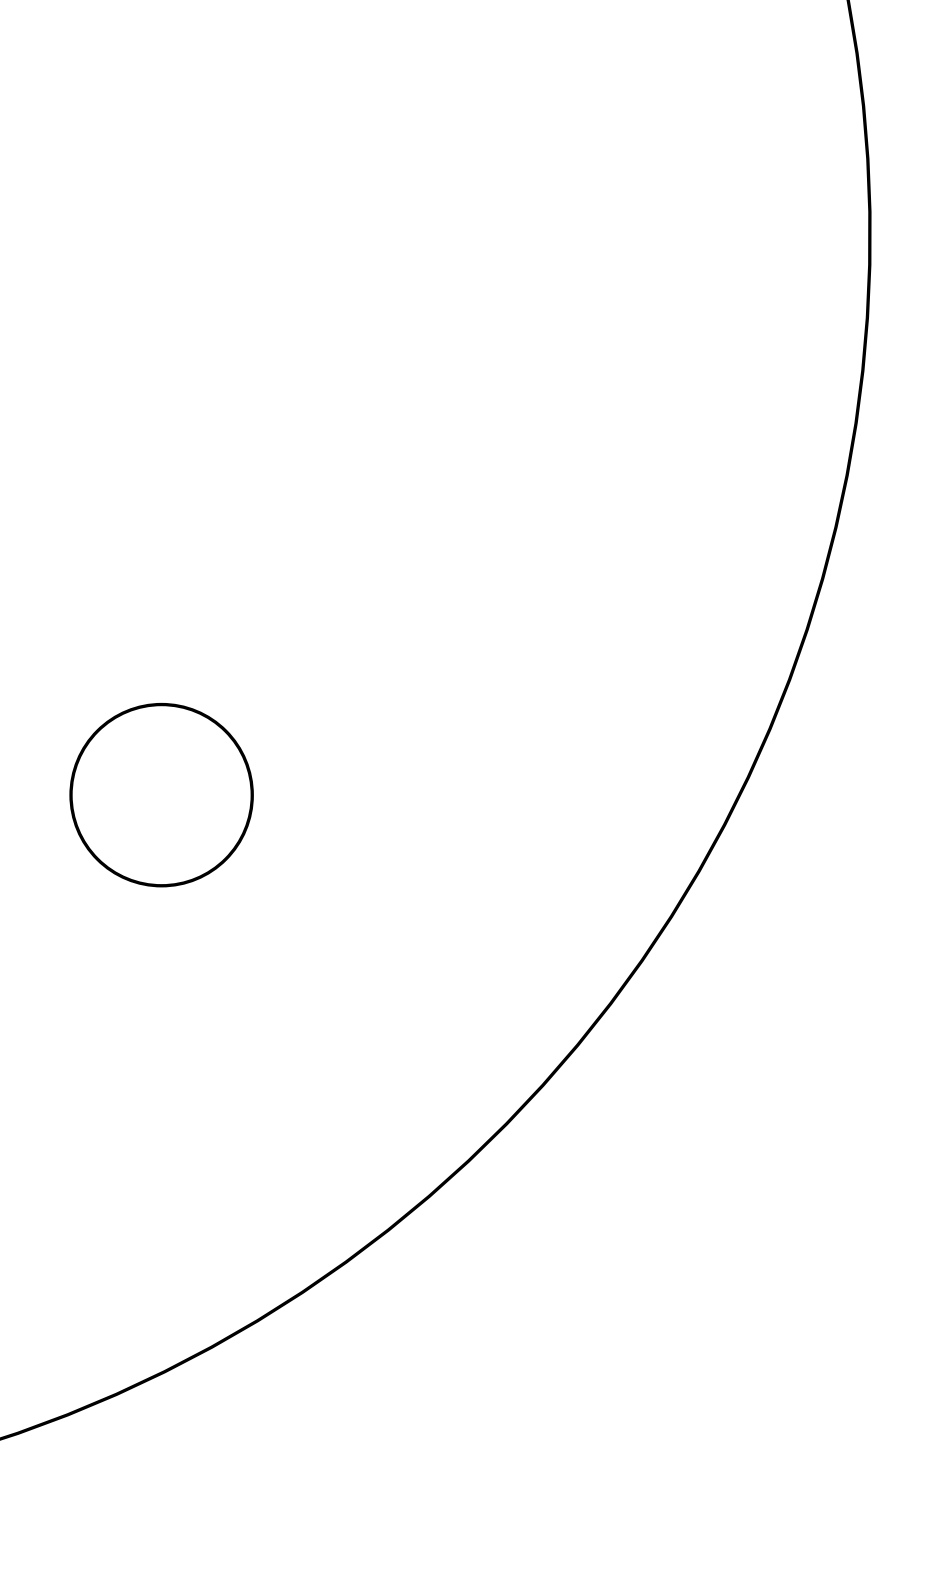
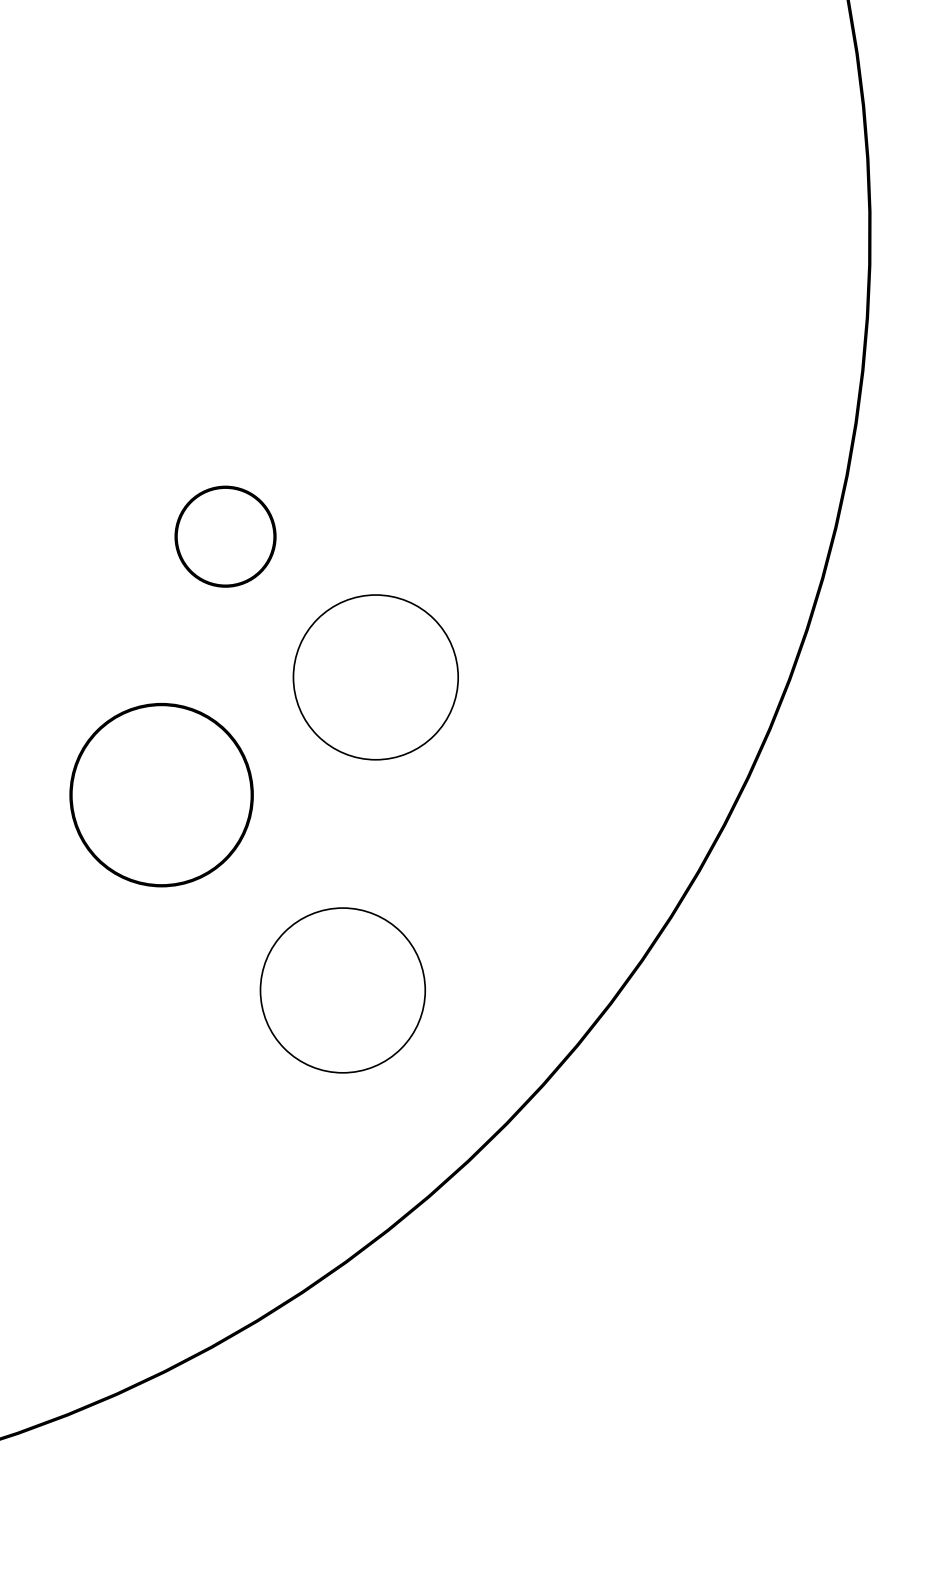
round board edge: none -> [174, 485, 277, 588]
round board edge: none -> [292, 594, 460, 761]
round board edge: none -> [259, 907, 427, 1074]

